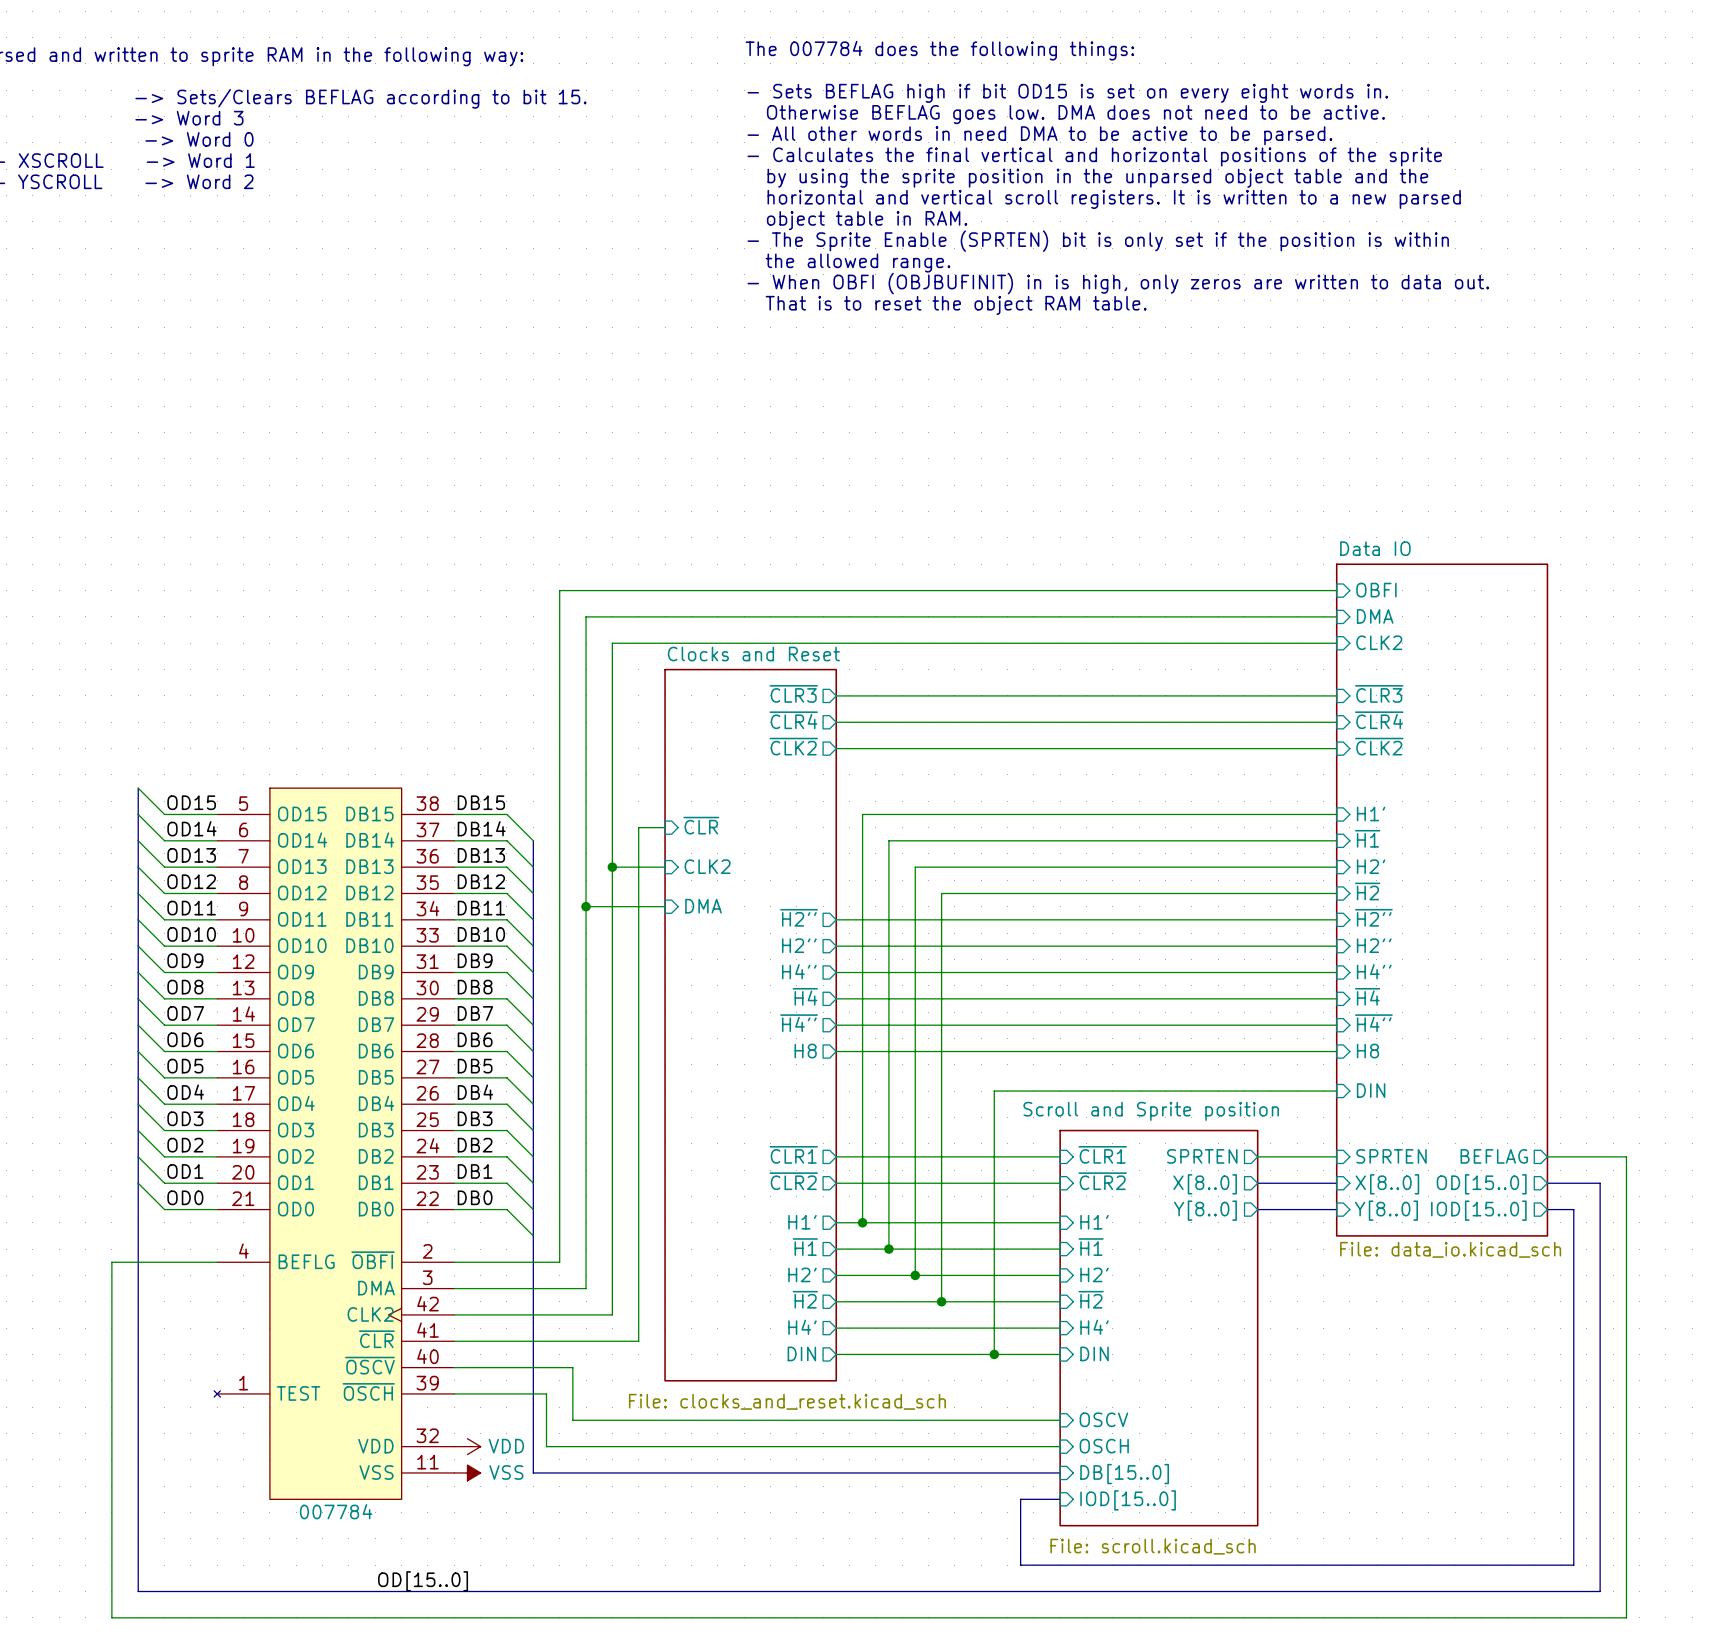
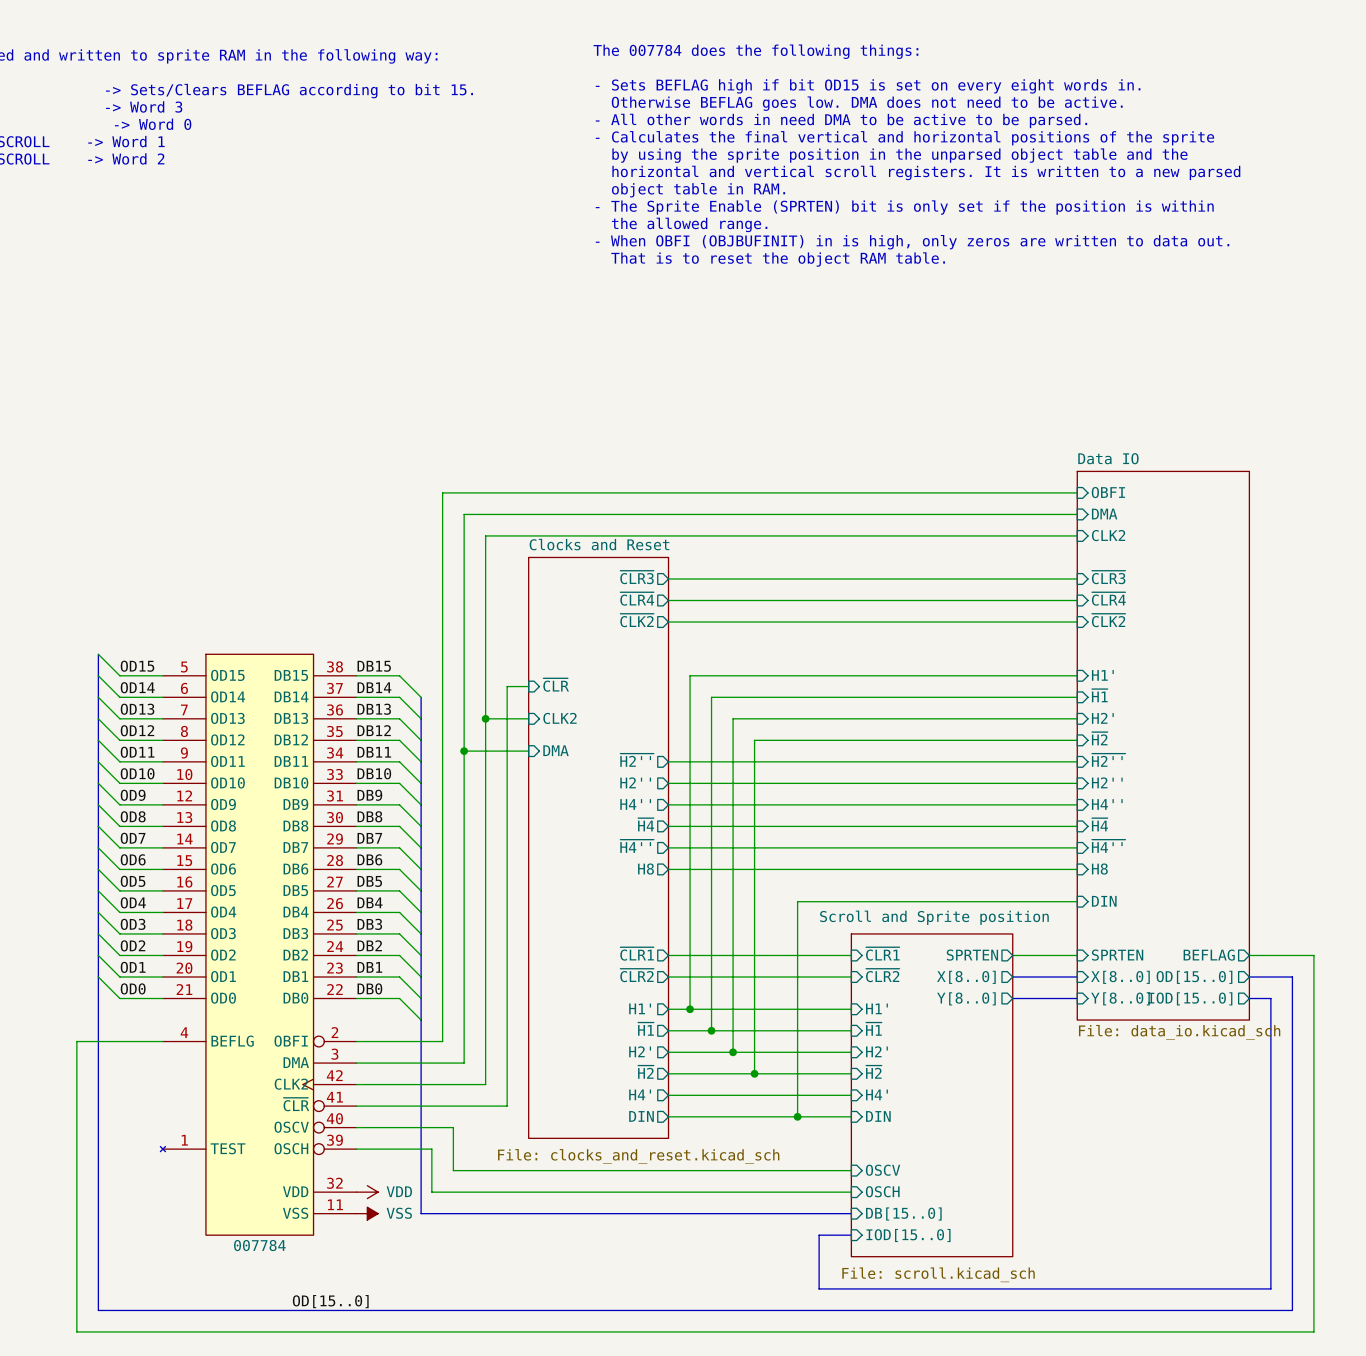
part symbol: [214, 788, 455, 1500] -> [160, 654, 357, 1236]

